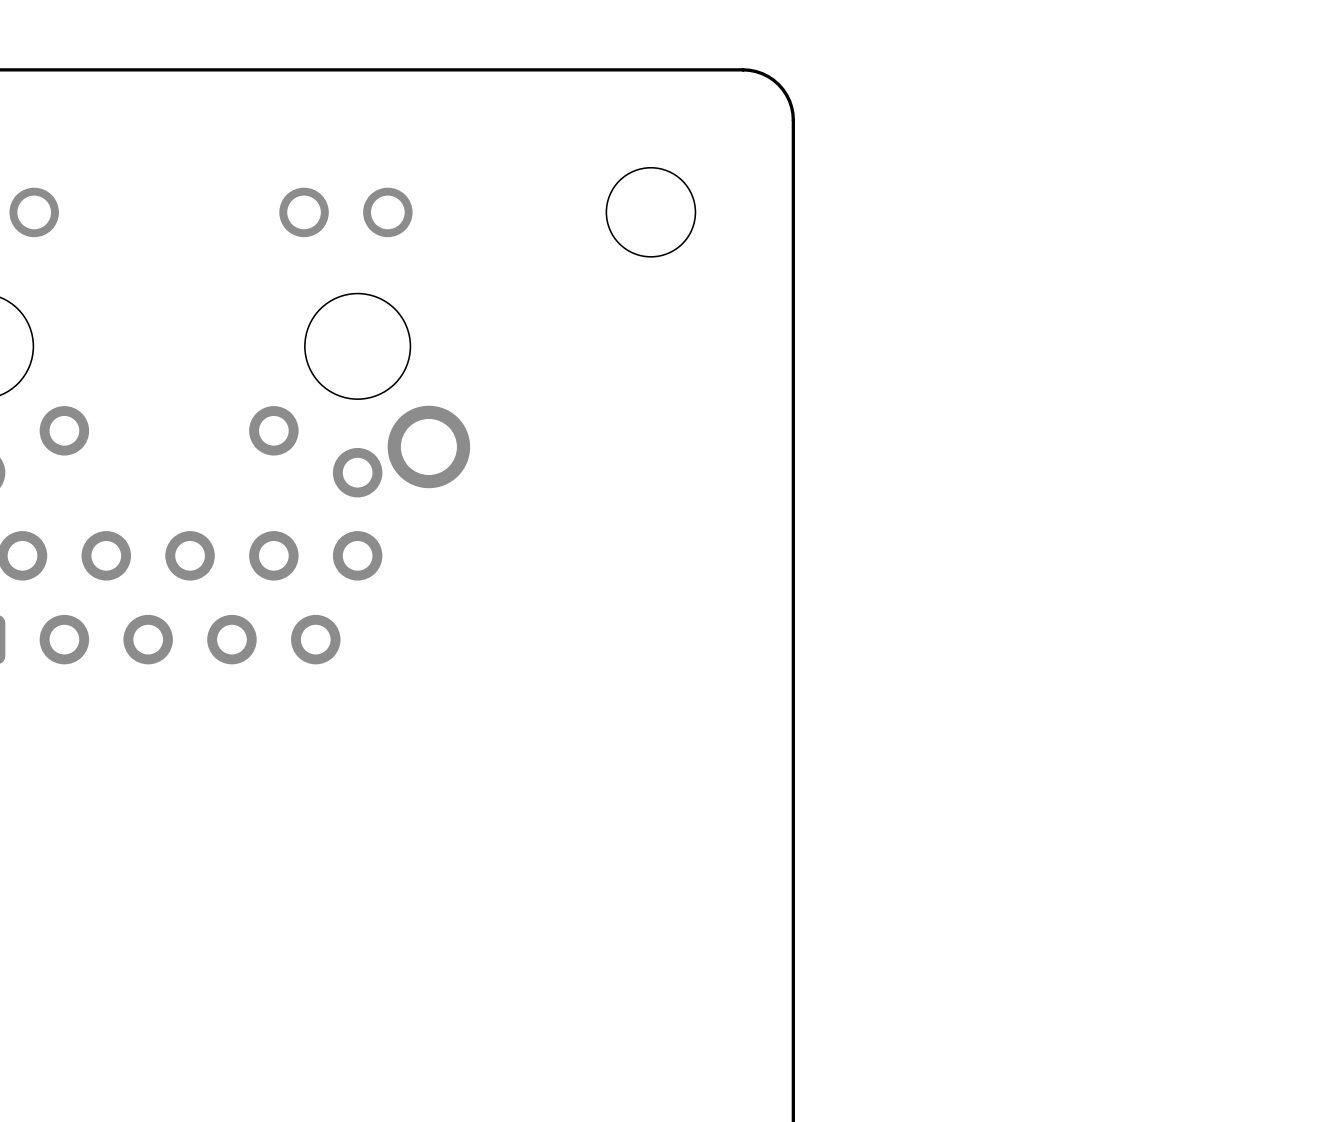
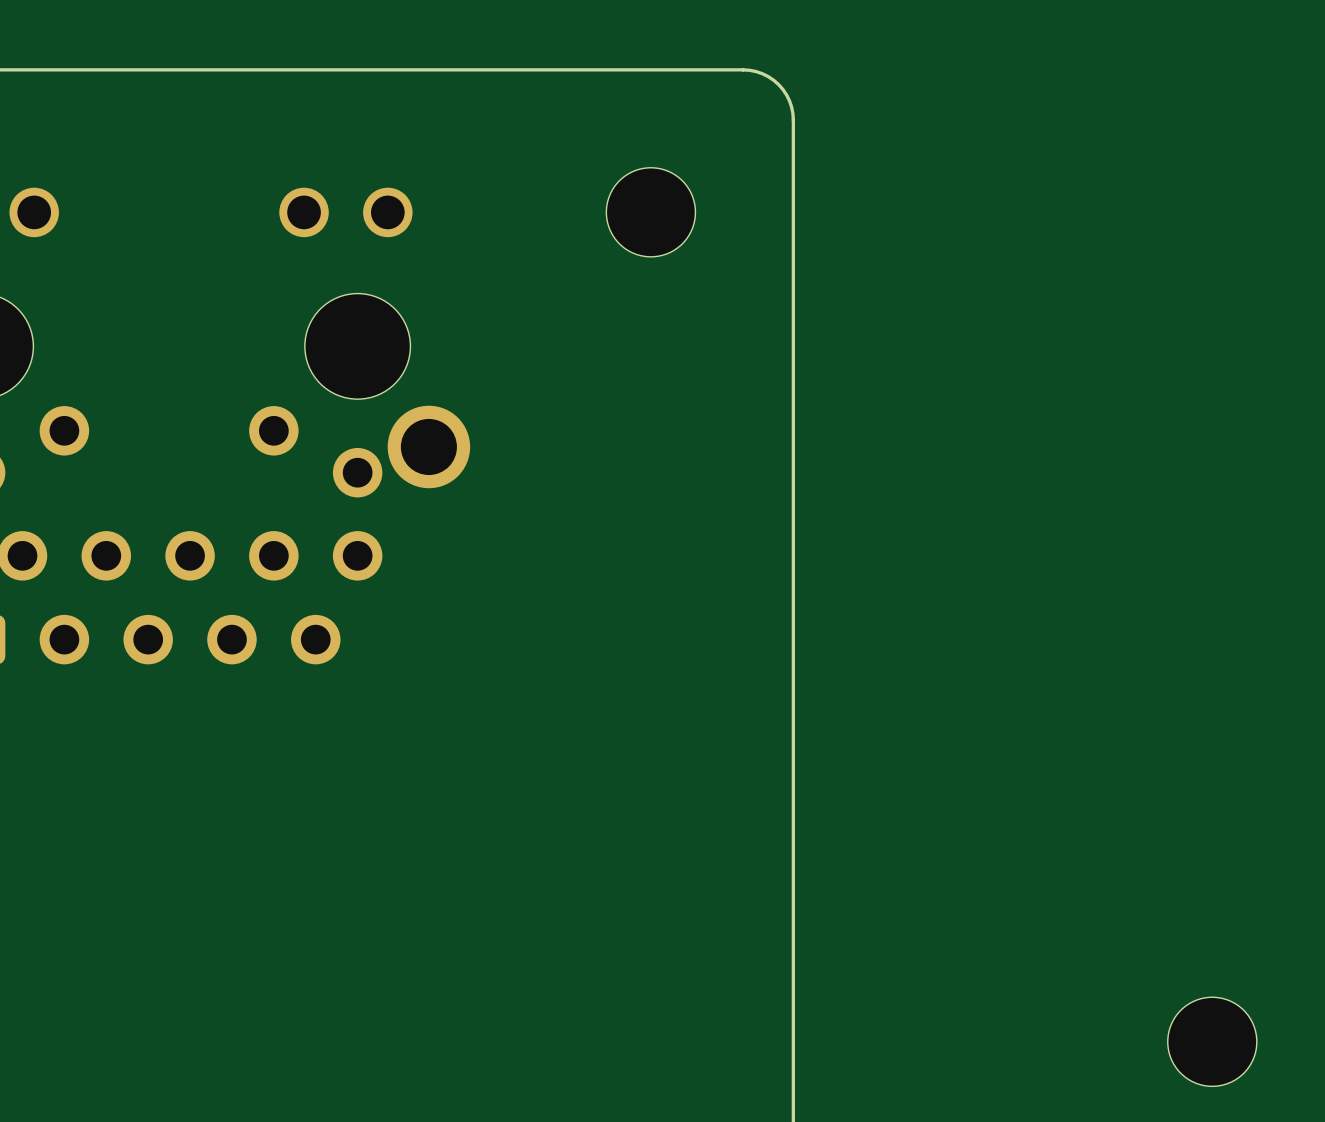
part: none -> (1212, 1041)

